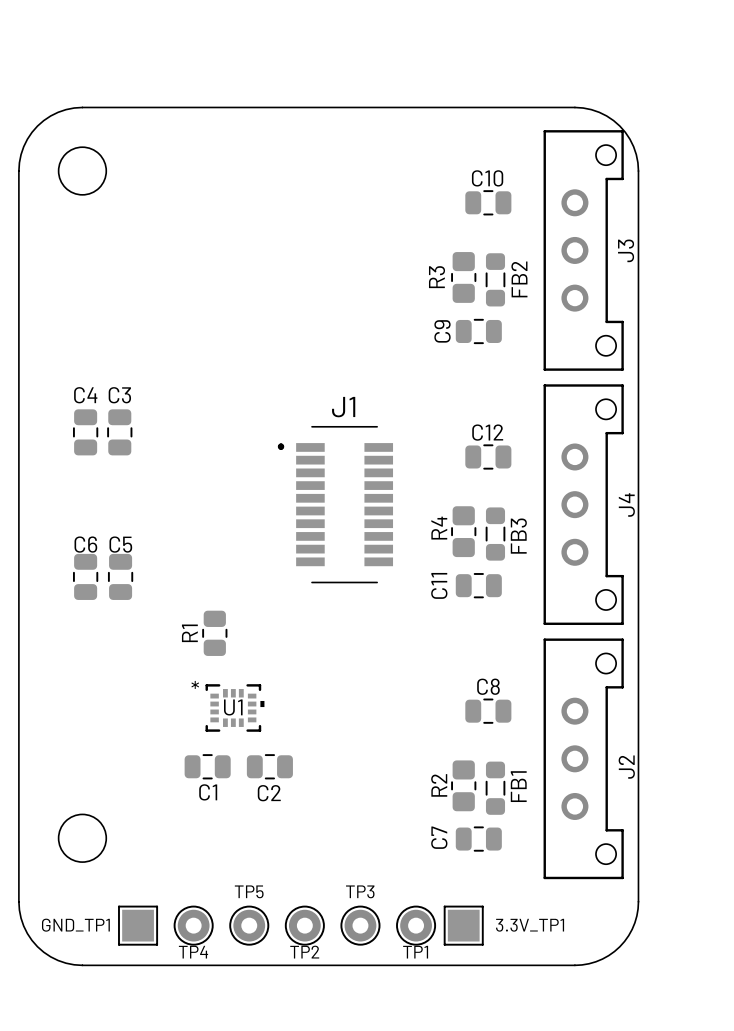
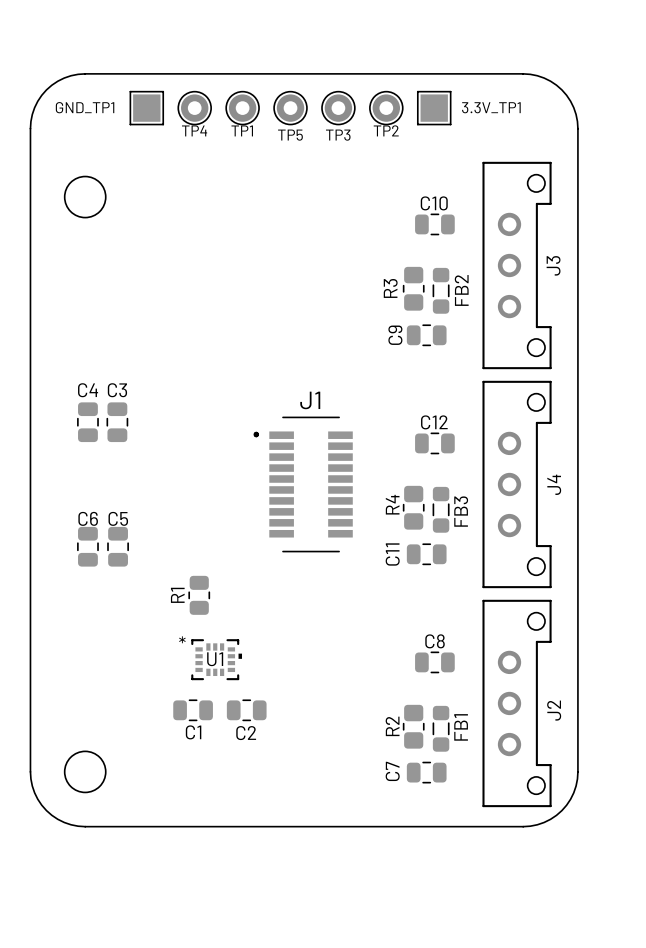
board edge: (18, 171) (23, 146) (37, 126) (58, 112) (82, 107) (574, 107) (599, 112) (613, 120) (625, 132) (636, 154) (638, 171) (638, 908) (632, 929) (619, 946) (602, 959) (582, 964) (74, 964) (58, 960) (43, 952) (32, 940) (23, 926) (18, 901) (18, 838) -> (30, 197) (30, 128) (34, 107) (41, 95) (51, 85) (64, 78) (78, 74) (530, 74) (550, 81) (561, 89) (570, 101) (577, 121) (577, 771) (573, 792) (566, 805) (556, 815) (544, 822) (523, 826) (85, 826) (64, 822) (46, 810) (34, 792) (30, 771)
TP5 name position: TP5 (249, 891) -> TP5 (290, 135)
TP3 name position: TP3 (360, 891) -> TP3 (338, 135)
GND_TP1 name position: GND_TP1 (75, 925) -> GND_TP1 (85, 107)
GND_TP1 position: (138, 925) -> (146, 108)
TP4 position: (193, 925) -> (194, 108)
TP5 position: (249, 925) -> (290, 108)
TP2 position: (304, 925) -> (386, 108)
TP3 position: (360, 925) -> (338, 108)
TP1 position: (416, 925) -> (242, 108)
3.3V_TP1 position: (463, 925) -> (434, 108)

